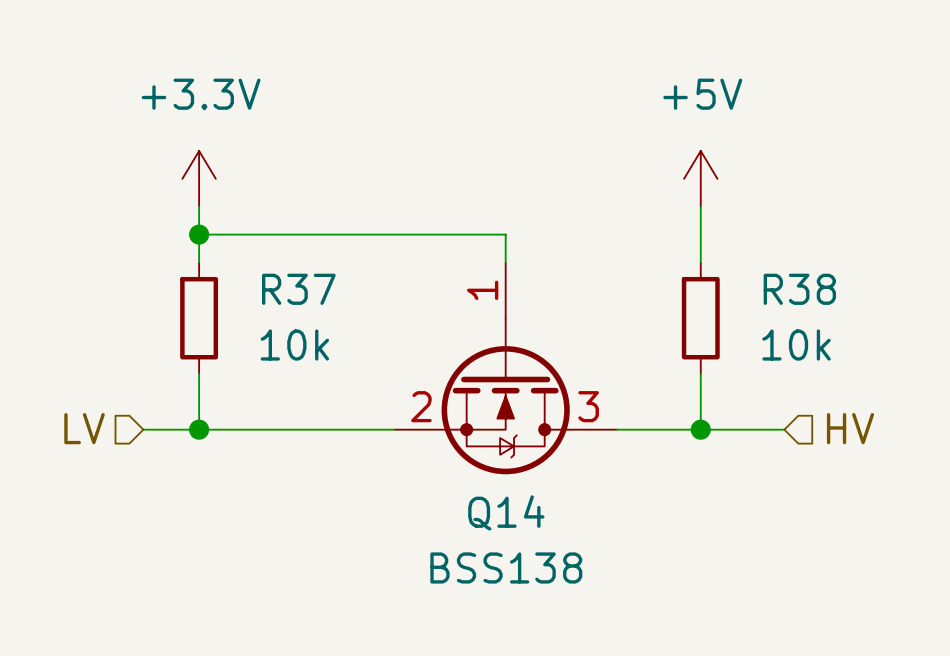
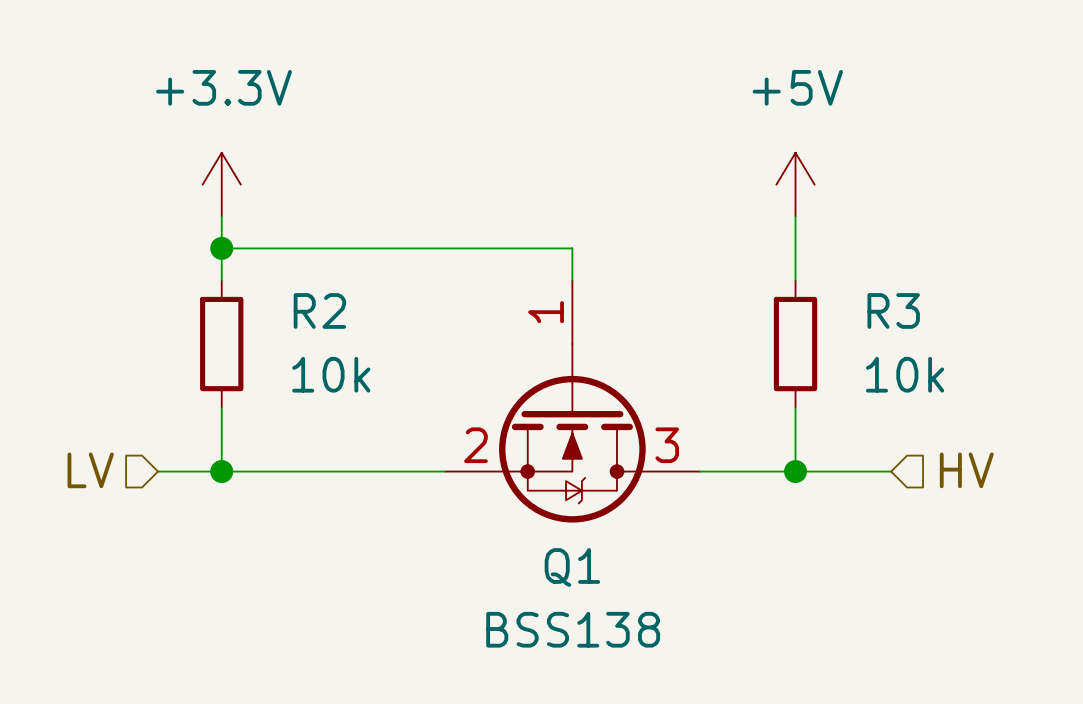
R37 name: R37 (298, 289) -> R2 (319, 310)
R38 name: R38 (799, 289) -> R3 (893, 310)
Q14 name: Q14 (506, 512) -> Q1 (572, 567)

